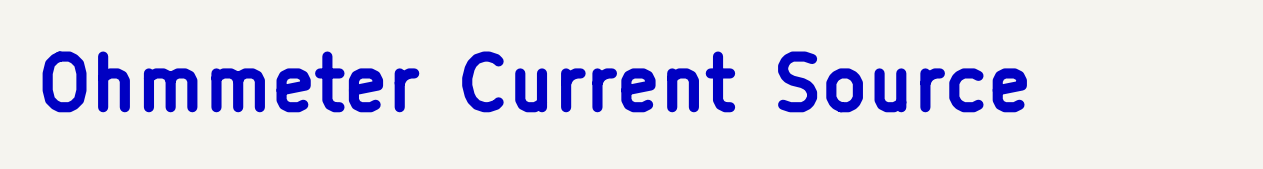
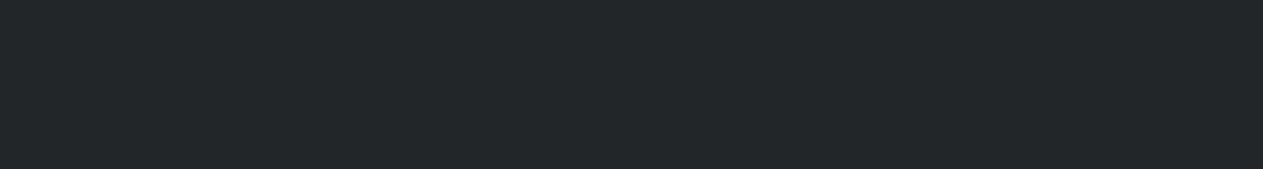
text: Ohmmeter Current Source (534, 81) -> none

